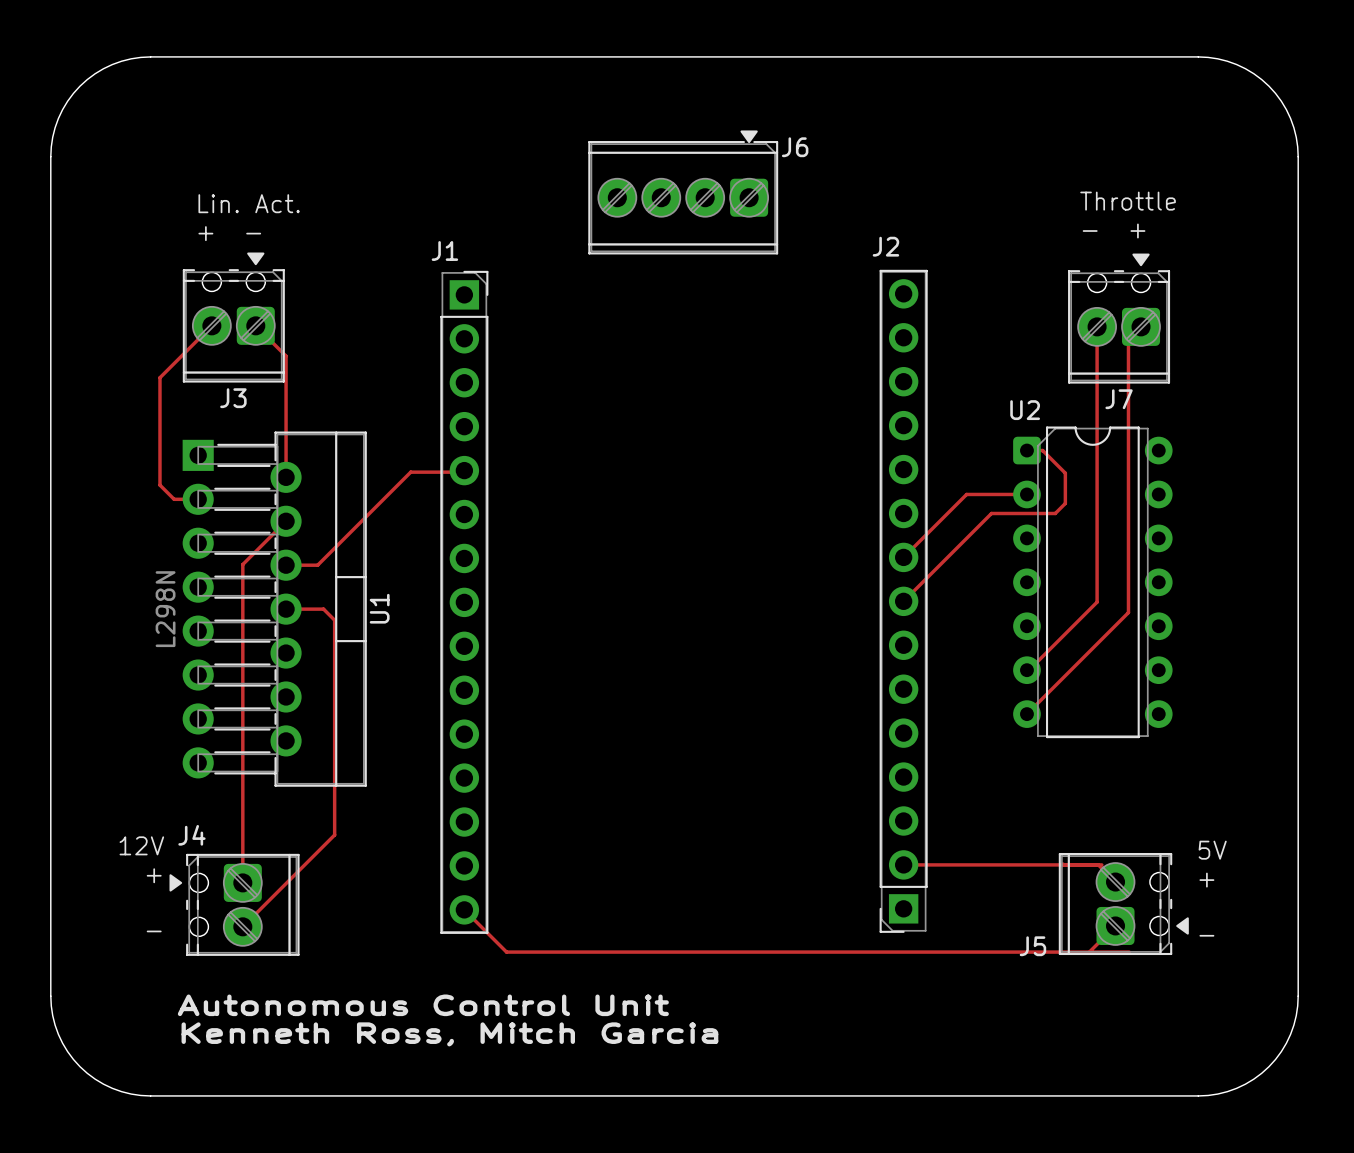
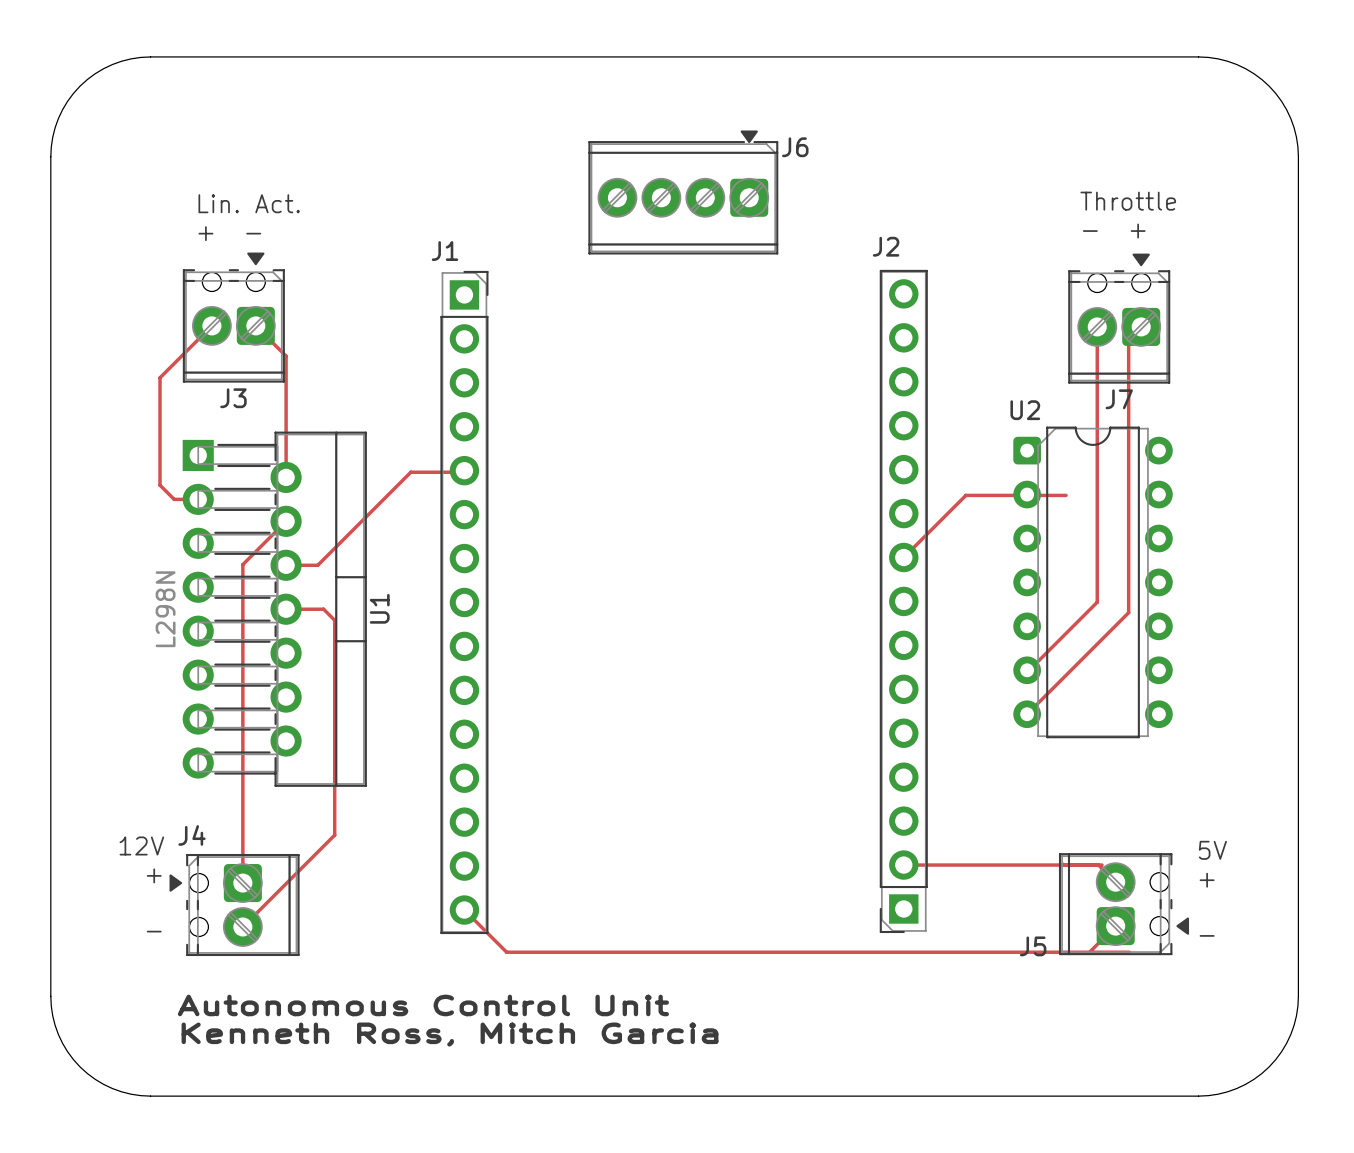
track: (1026, 450) (1042, 450) (1065, 473) (1065, 503) (1055, 513) (991, 513) (903, 601) -> none
track: (965, 495) (1027, 495) -> (965, 495) (1066, 495)

